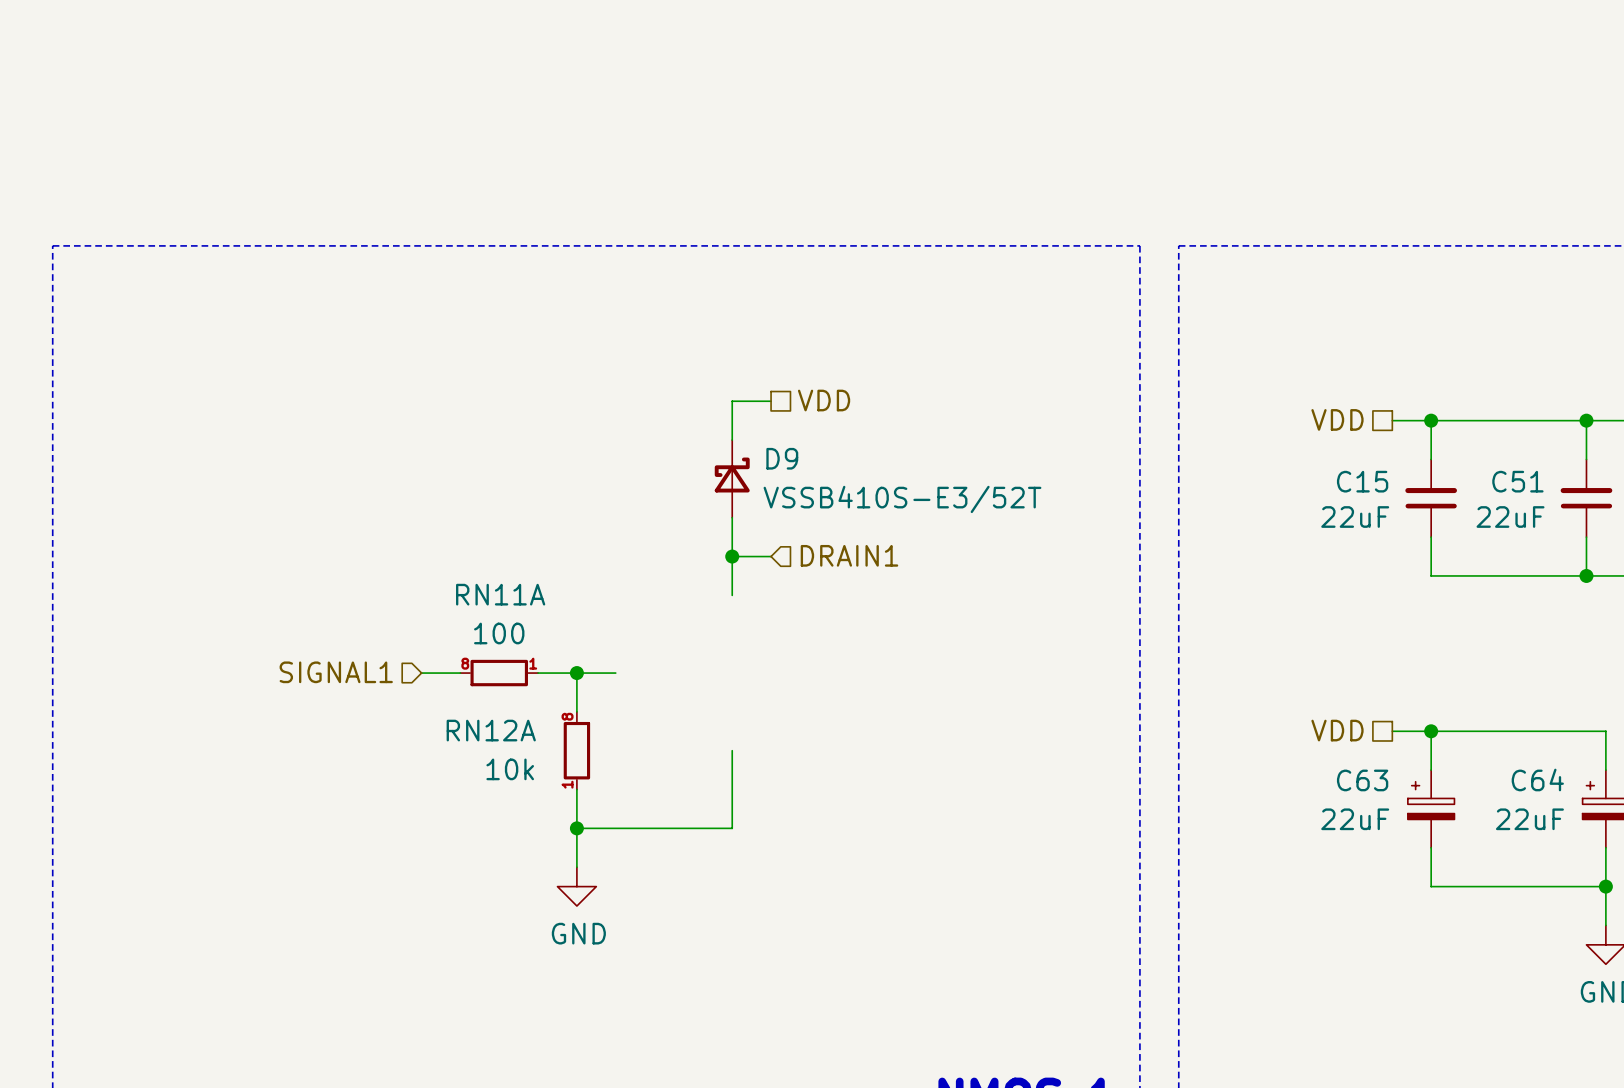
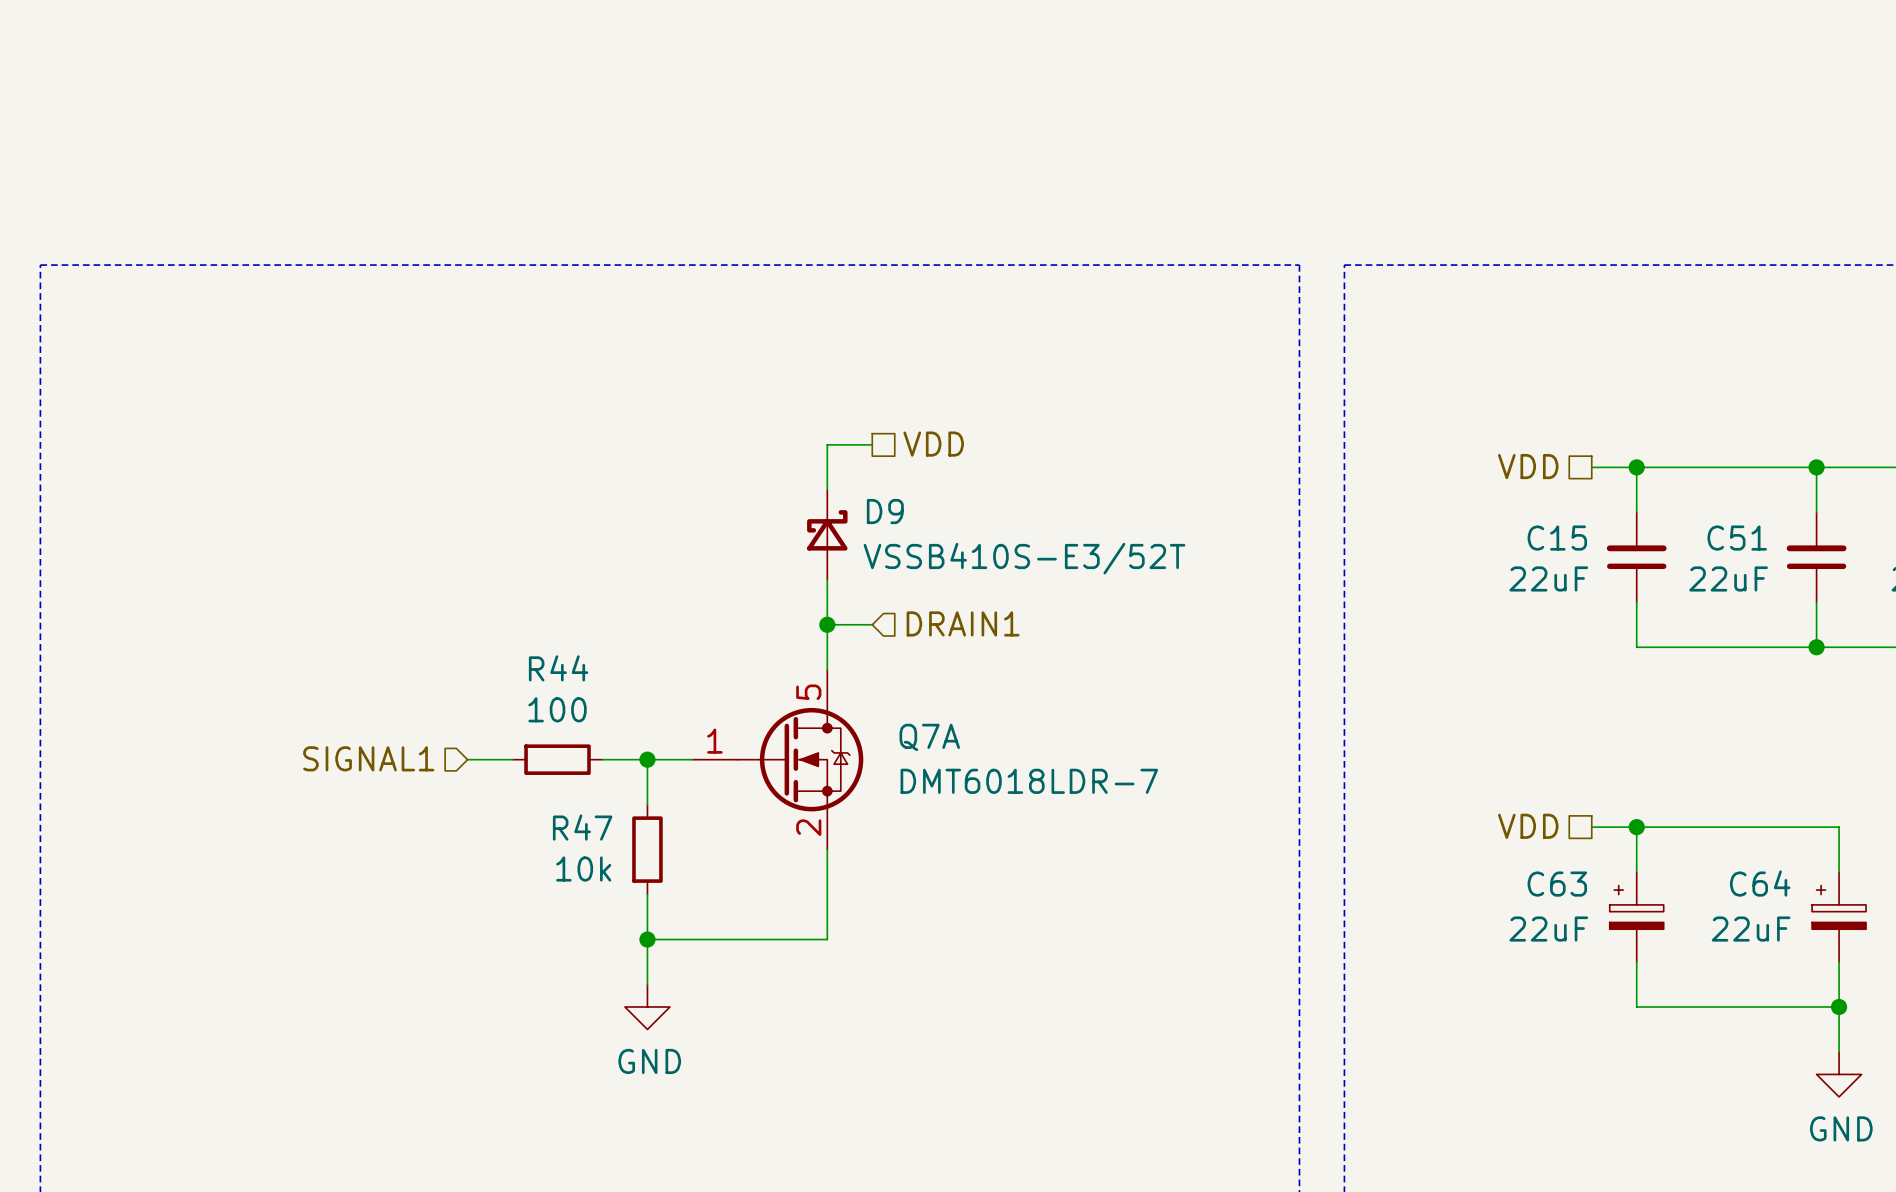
RN11A: 100 (499, 673) -> none
R44: none -> 100 (557, 759)
Q7A: none -> DMT6018LDR-7 (777, 759)
RN12A: 10k (576, 750) -> none
R47: none -> 10k (647, 849)

